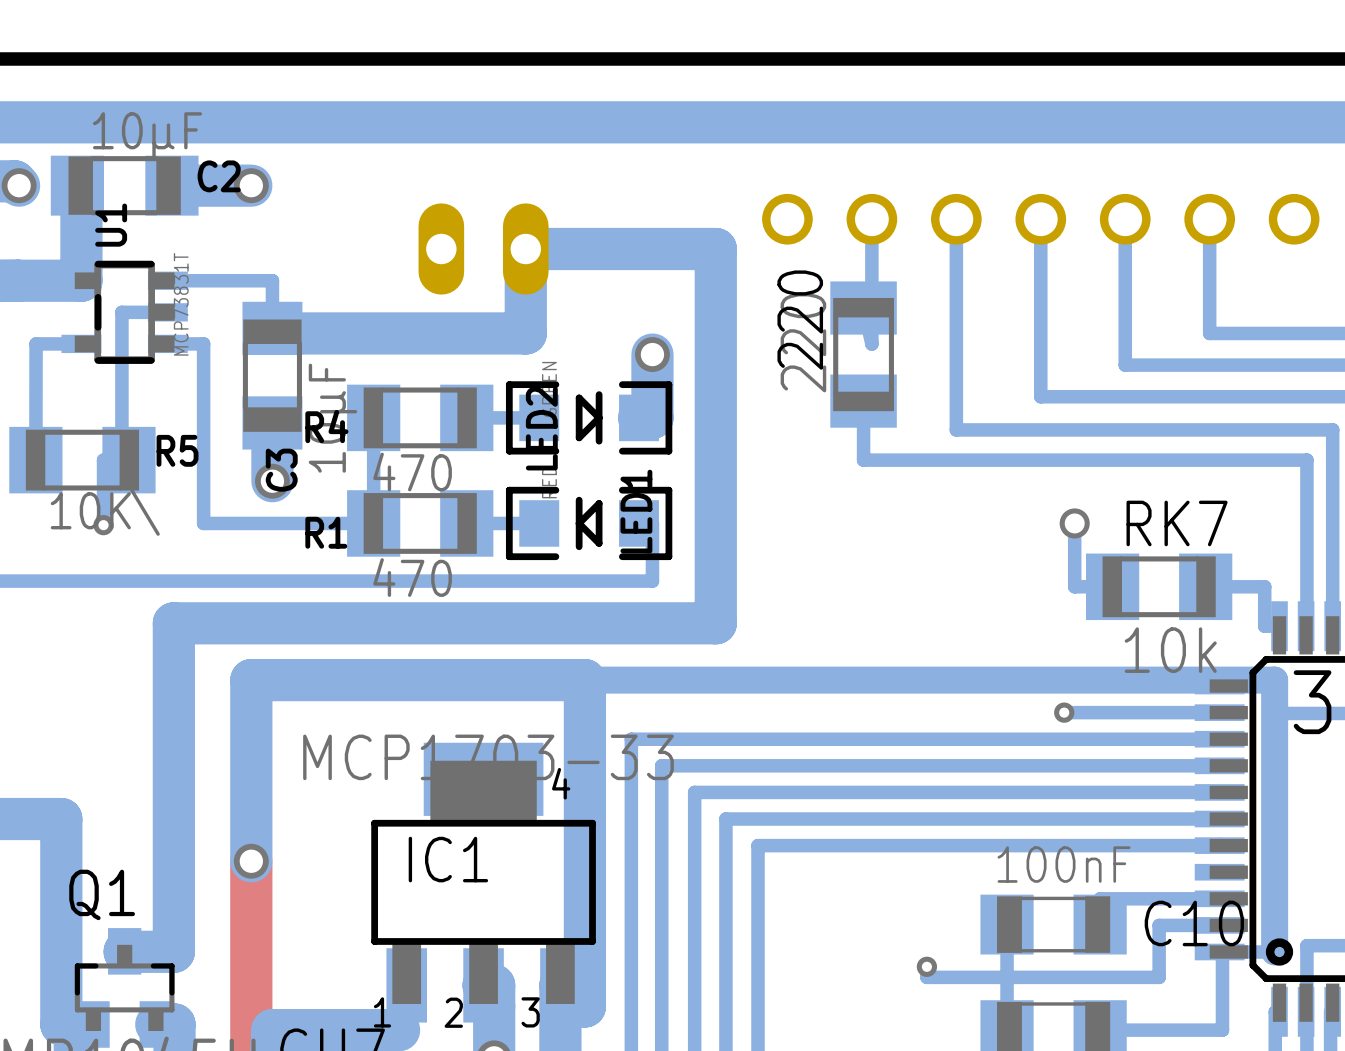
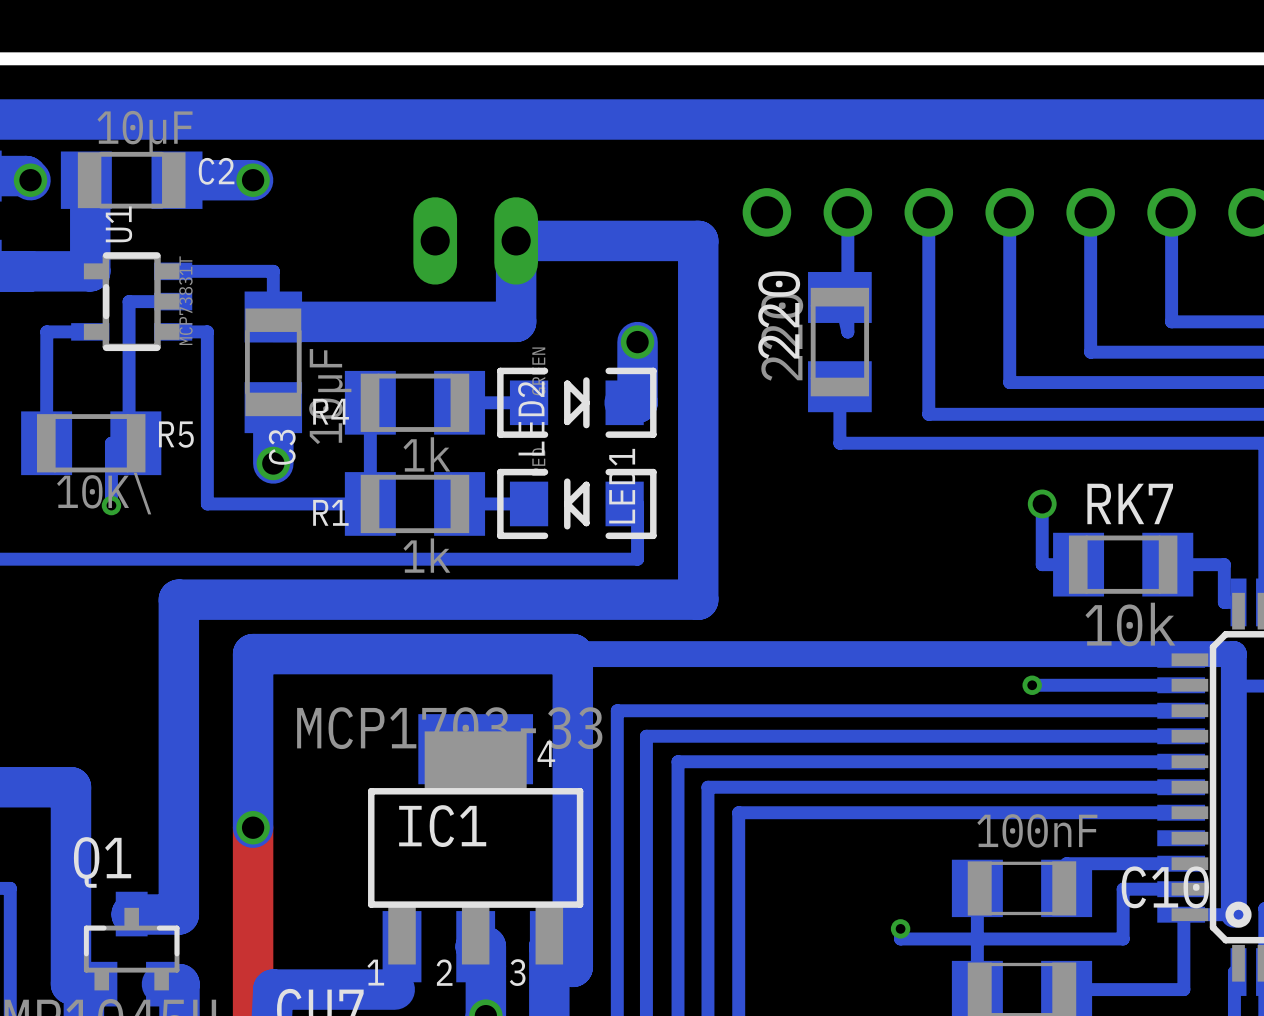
R4 value: 470 (412, 471) -> 1k (426, 454)
R1 value: 470 (412, 577) -> 1k (426, 555)

